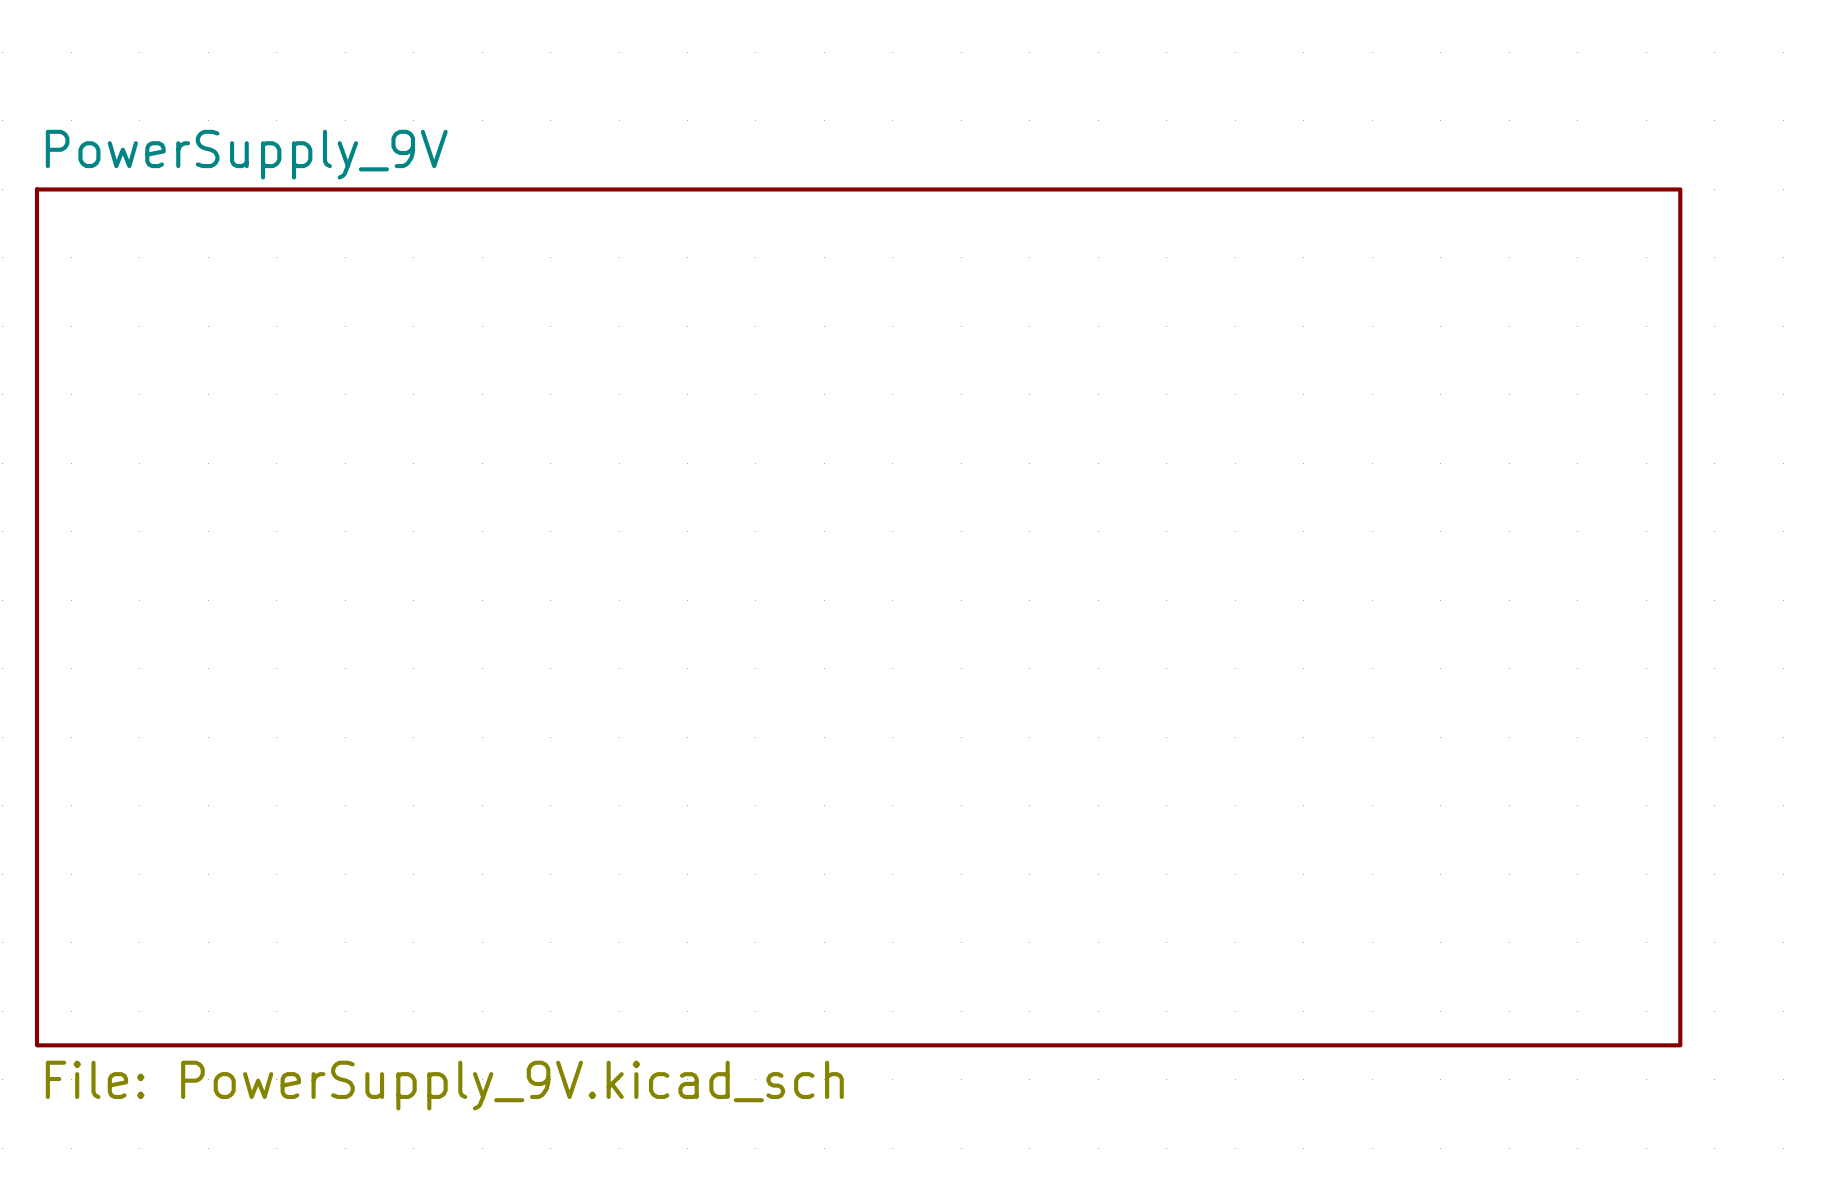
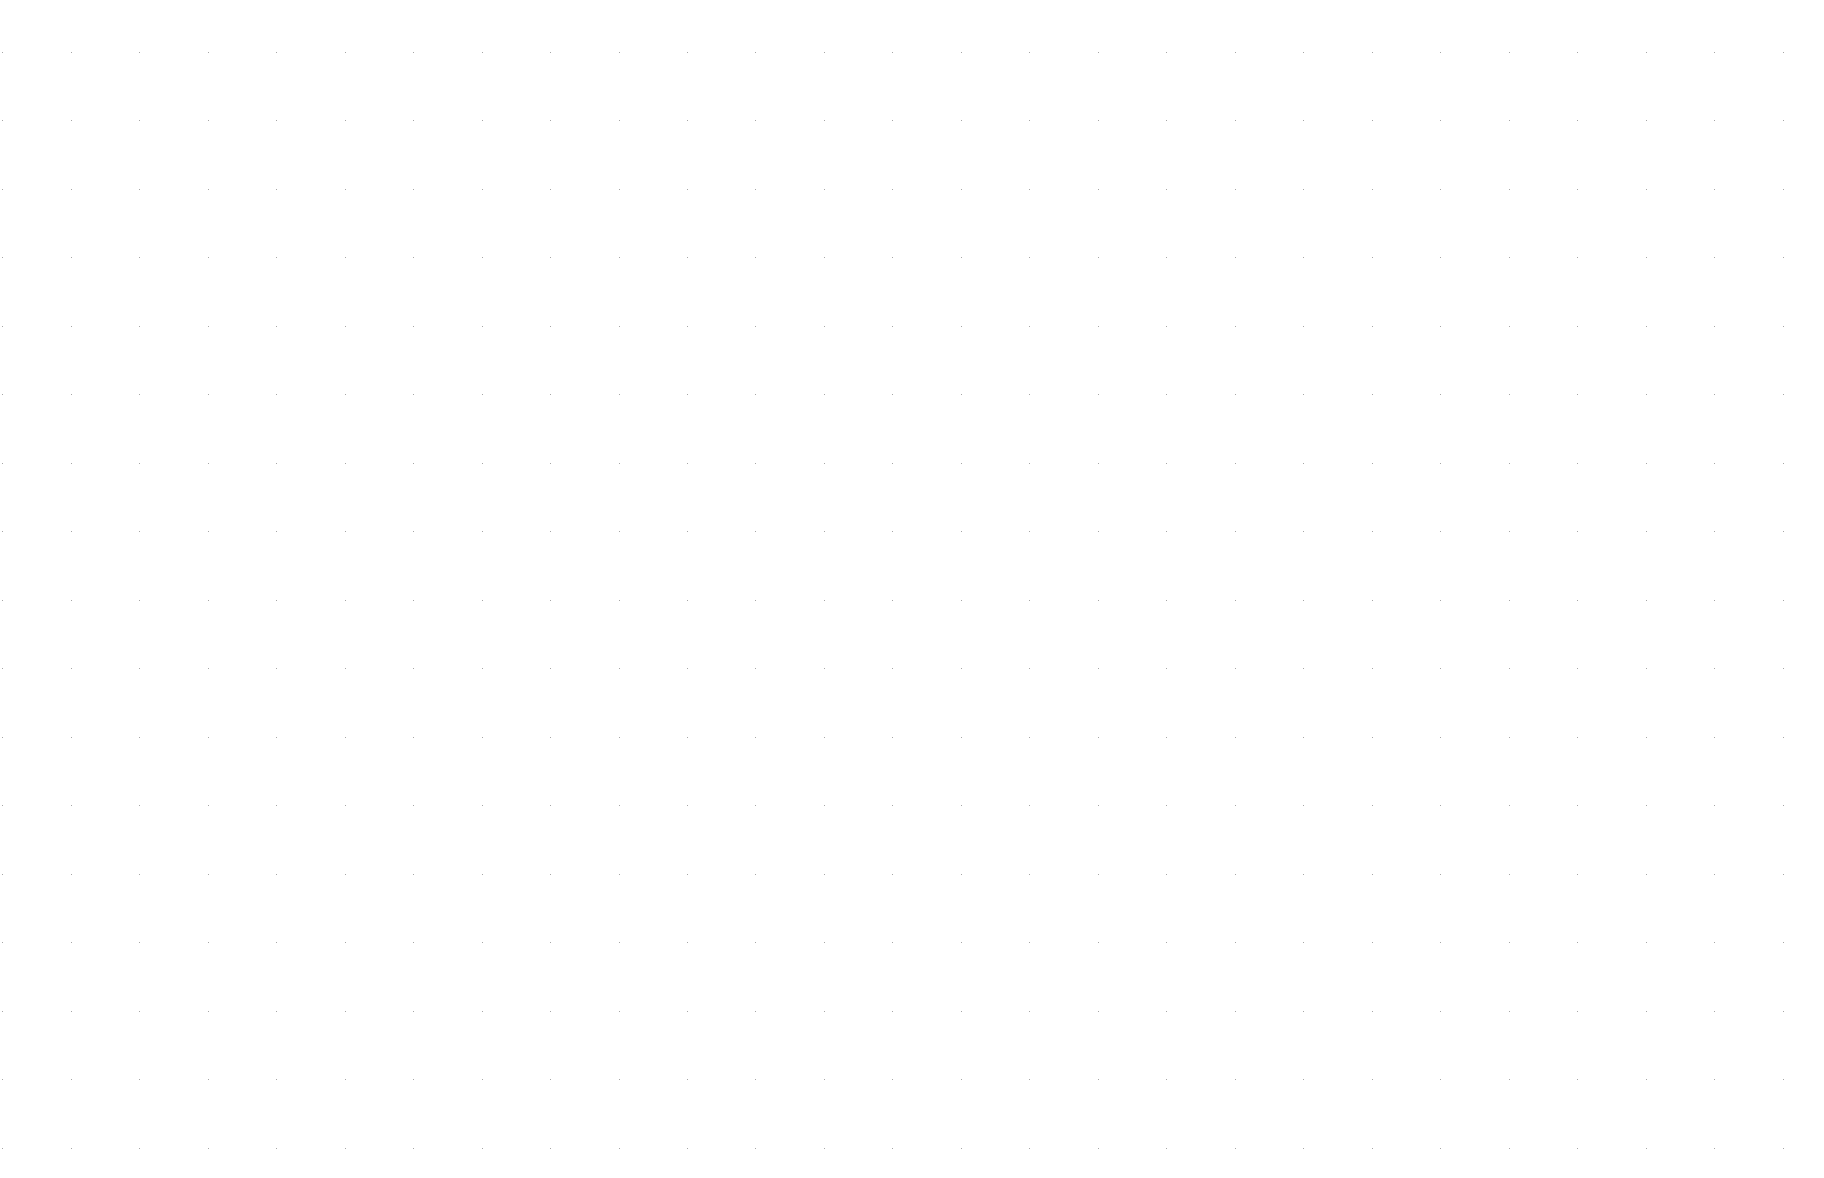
sheet PowerSupply_9V: File: PowerSupply_9V.kicad_sch (858, 617) -> none

